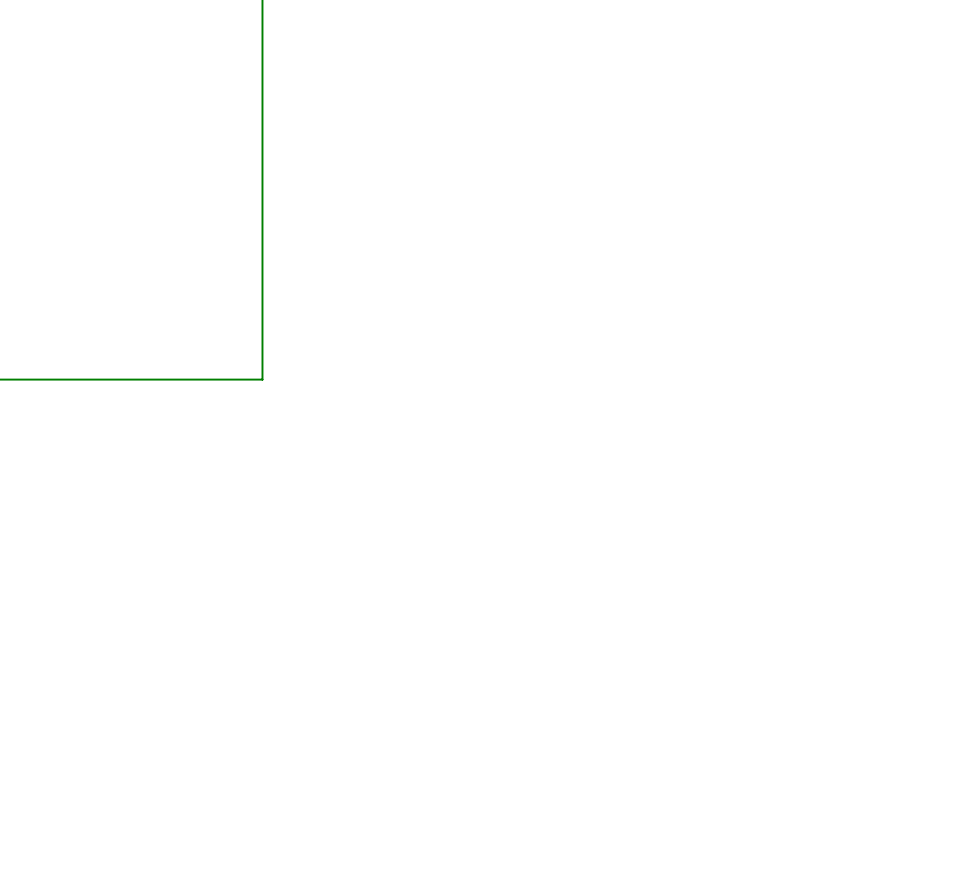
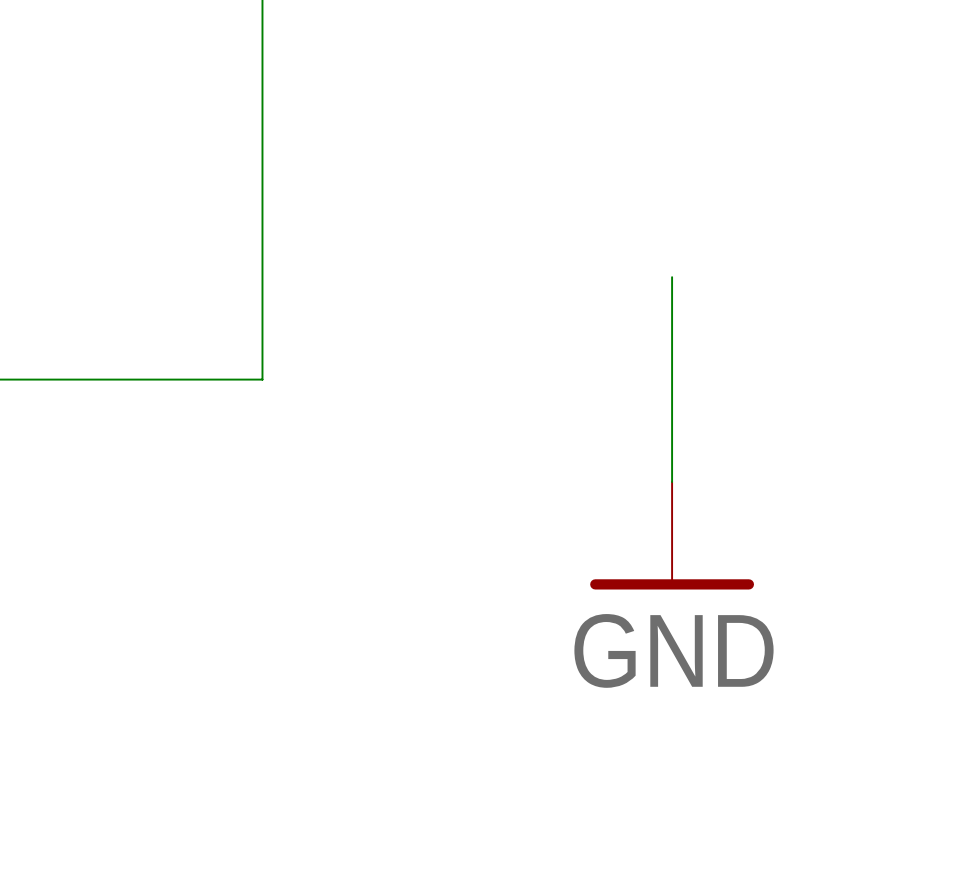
wire: none -> (672, 277) (672, 481)
power symbol: none -> GND (672, 535)

